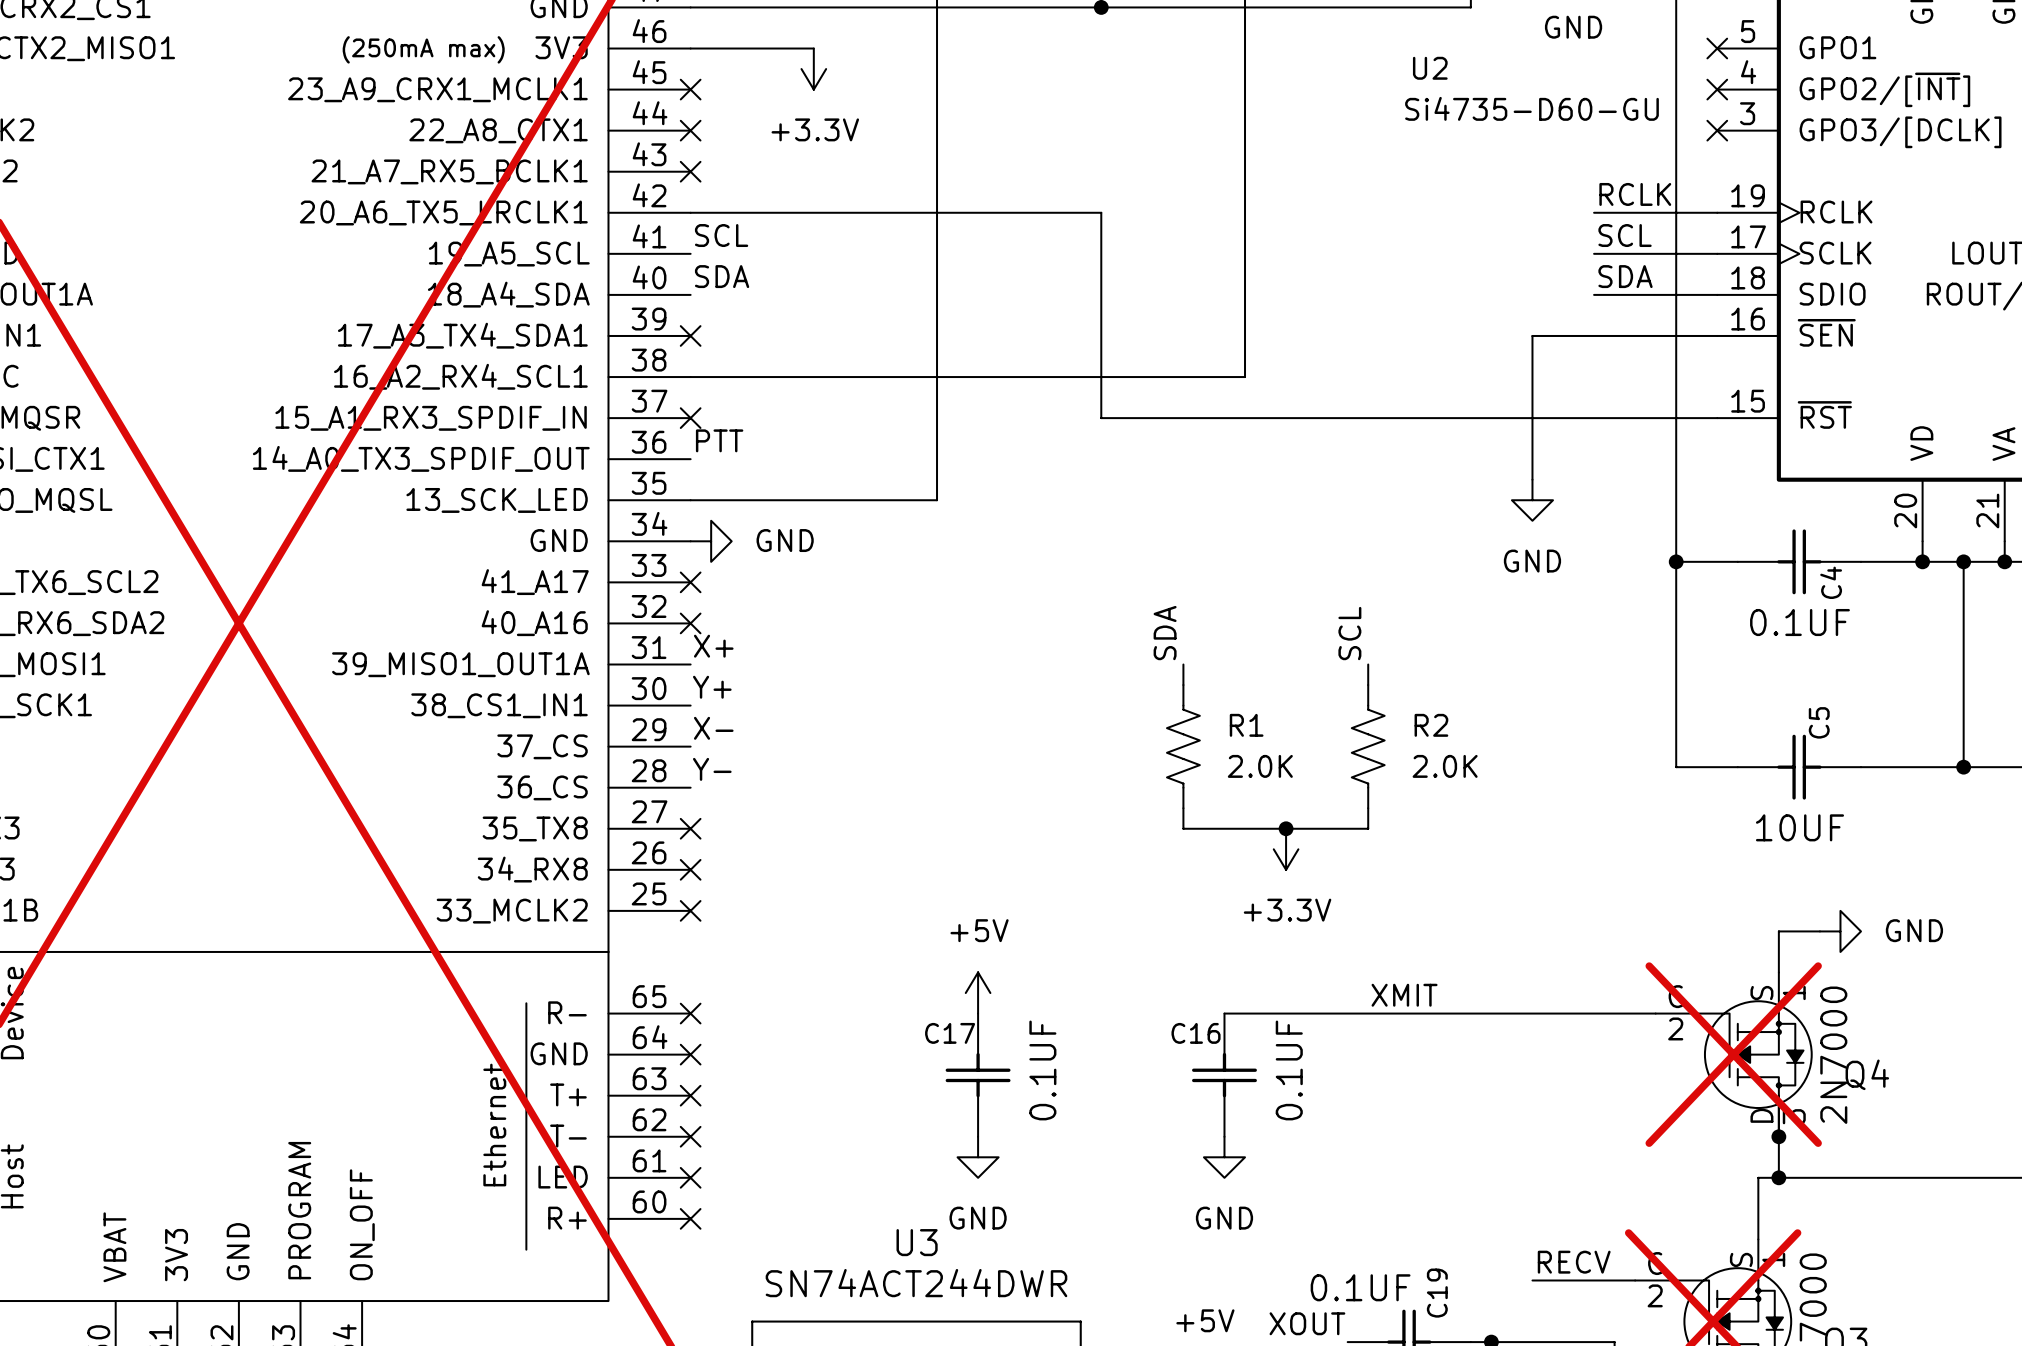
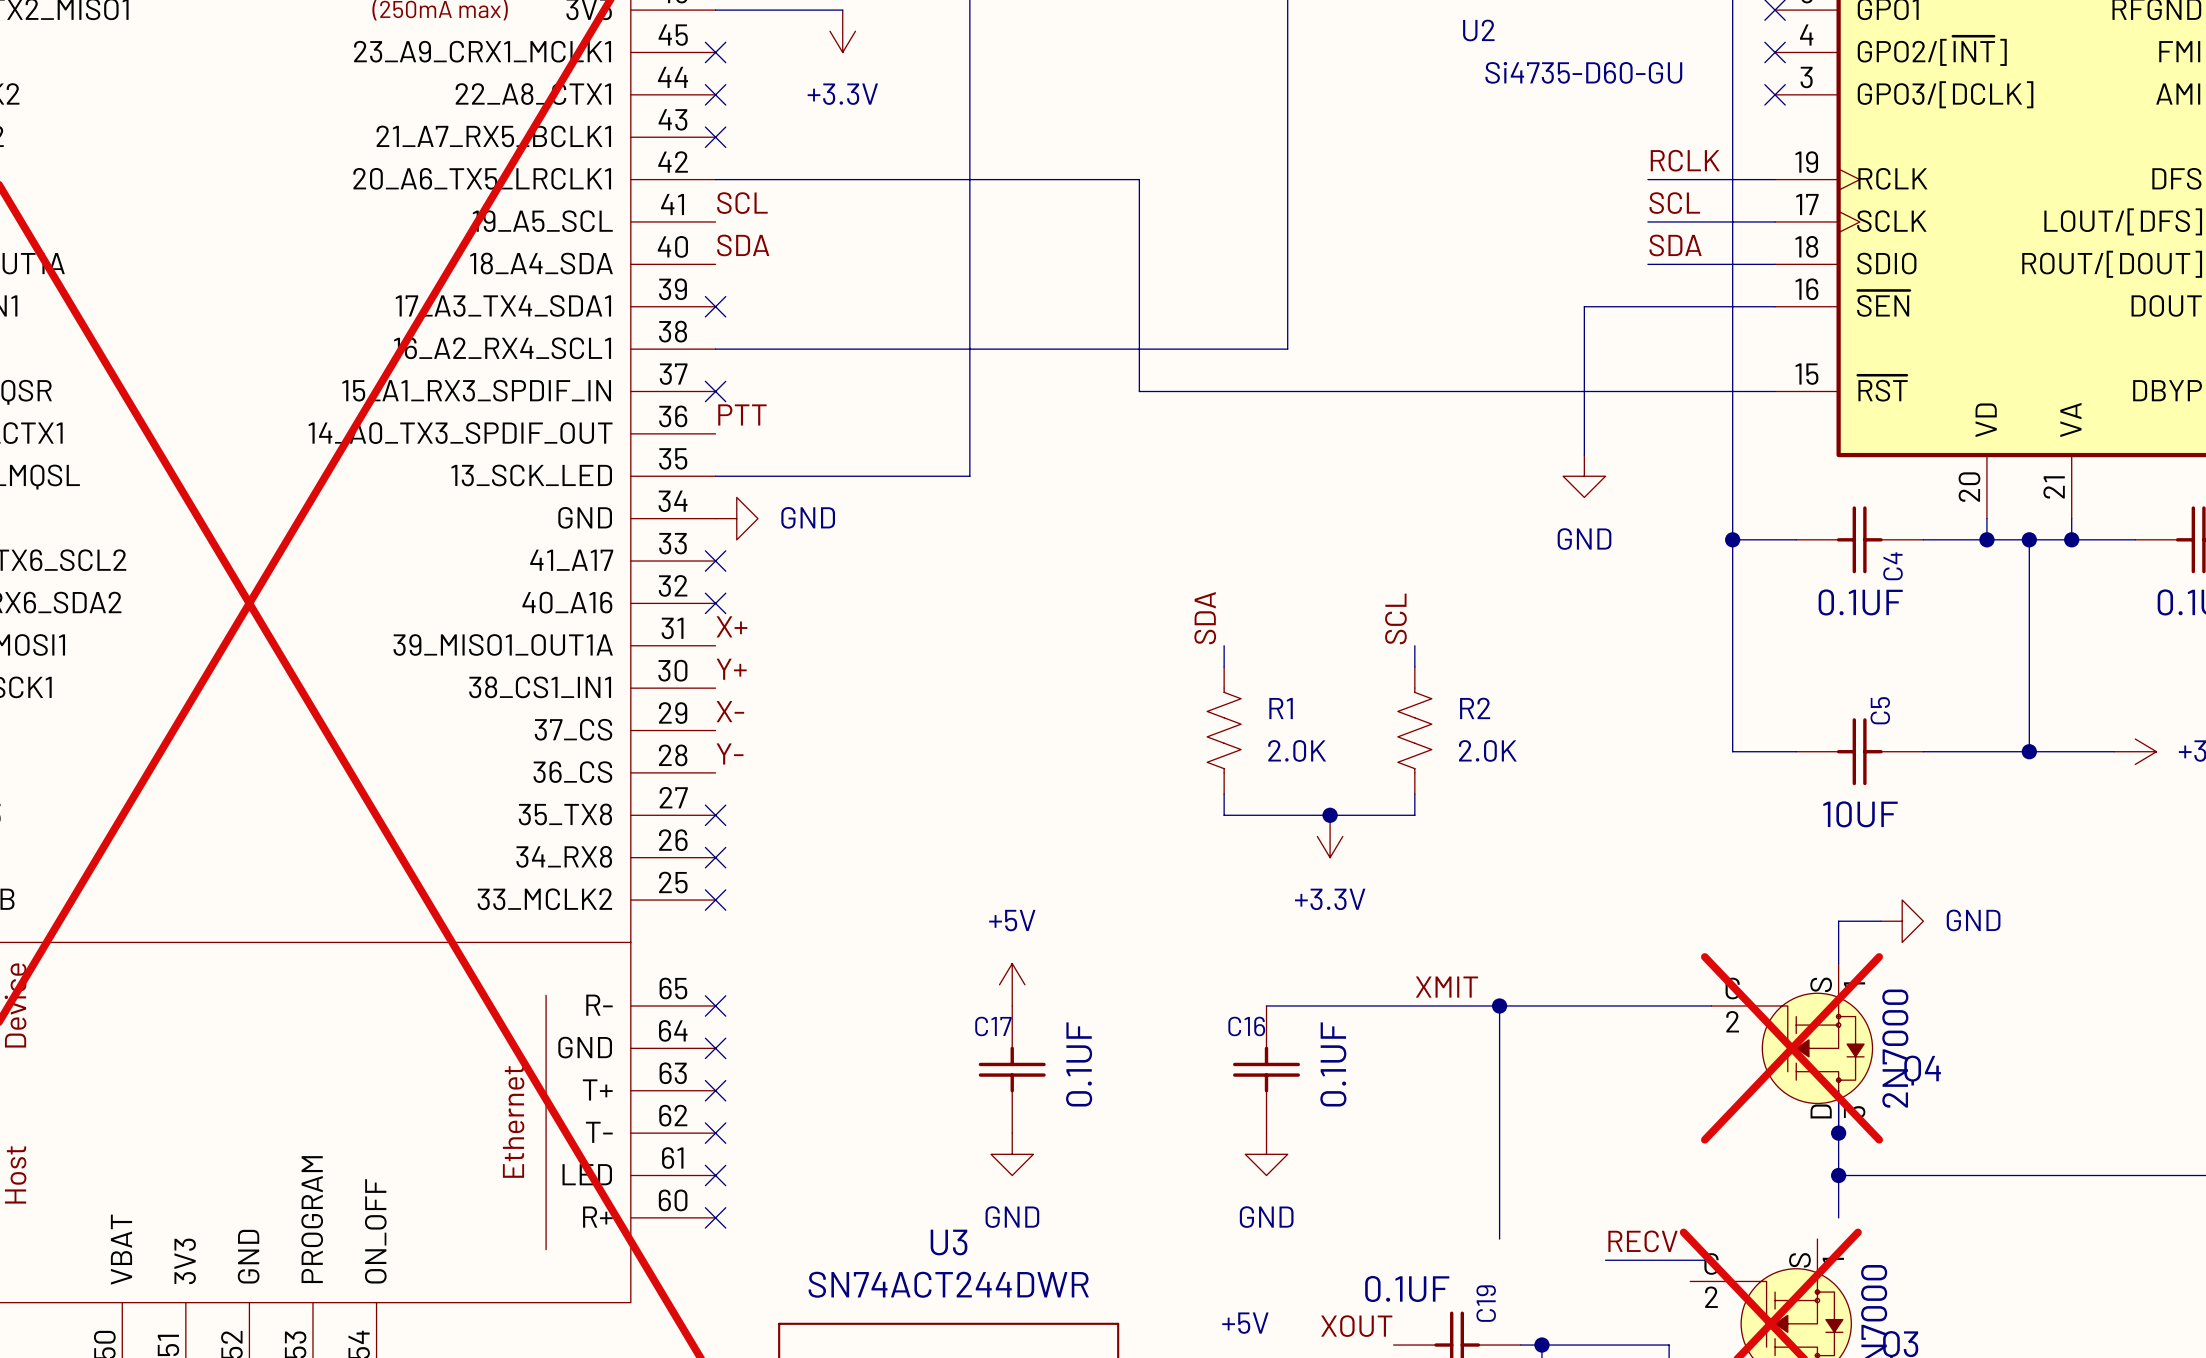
wire: none -> (1499, 1005) (1499, 1239)
junction: none -> (1499, 1005)
wire: (1778, 1177) (1758, 1177) (1758, 1239) -> (1838, 1175) (1838, 1217)
label position: RECV (1574, 1262) -> RECV (1642, 1241)
wire: (1532, 1280) (1635, 1280) -> (1605, 1260) (1711, 1260)

